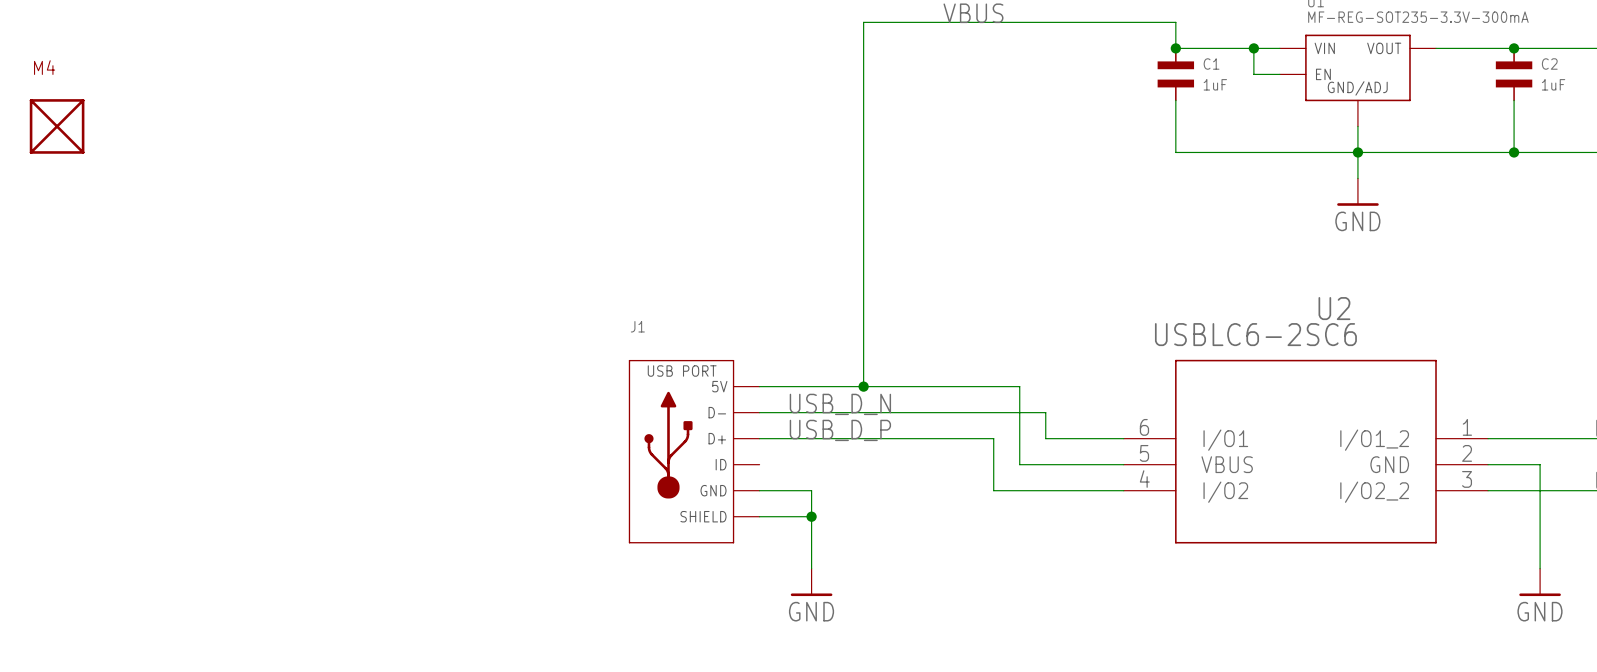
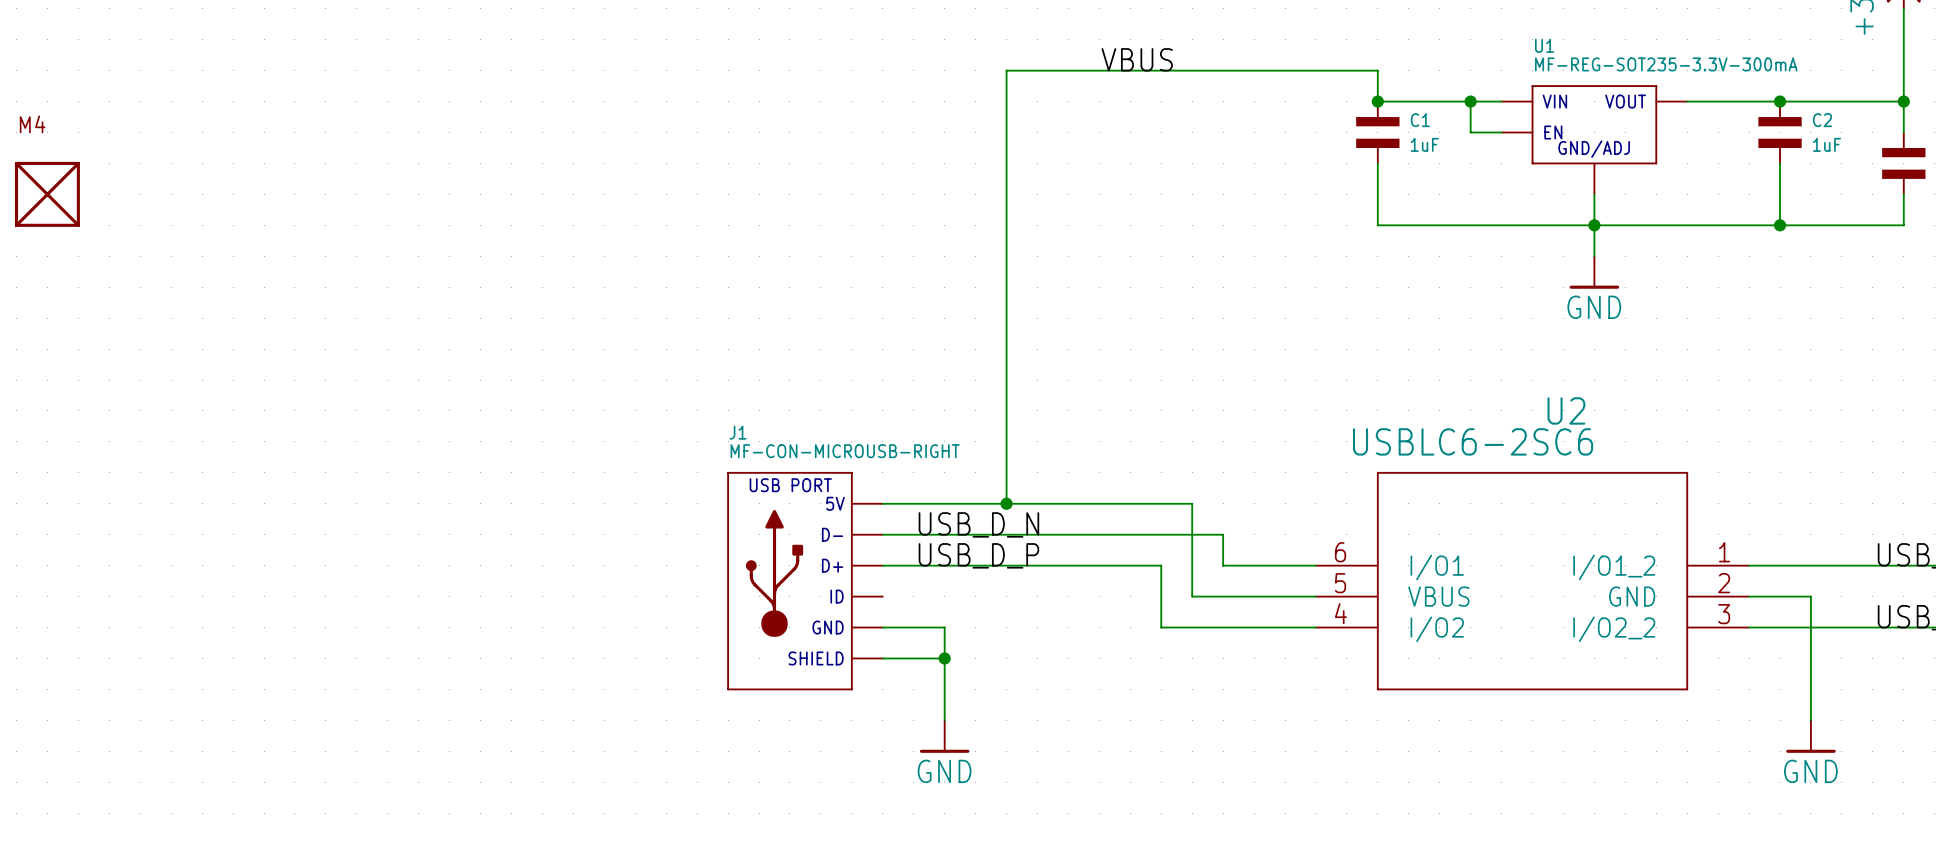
J1 value: none -> MF-CON-MICROUSB-RIGHT (845, 451)

